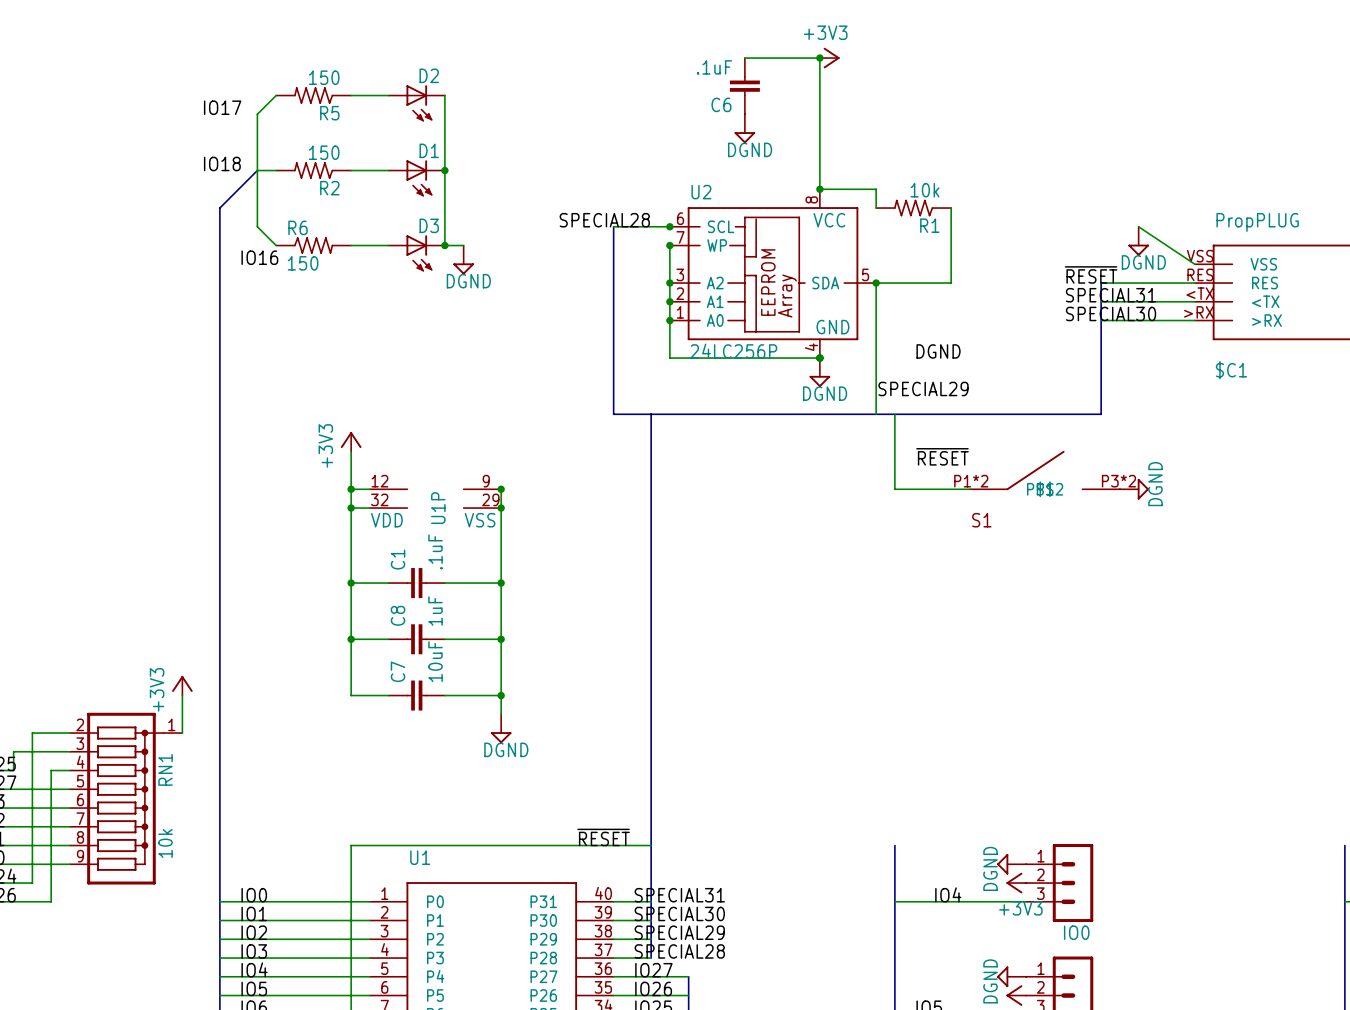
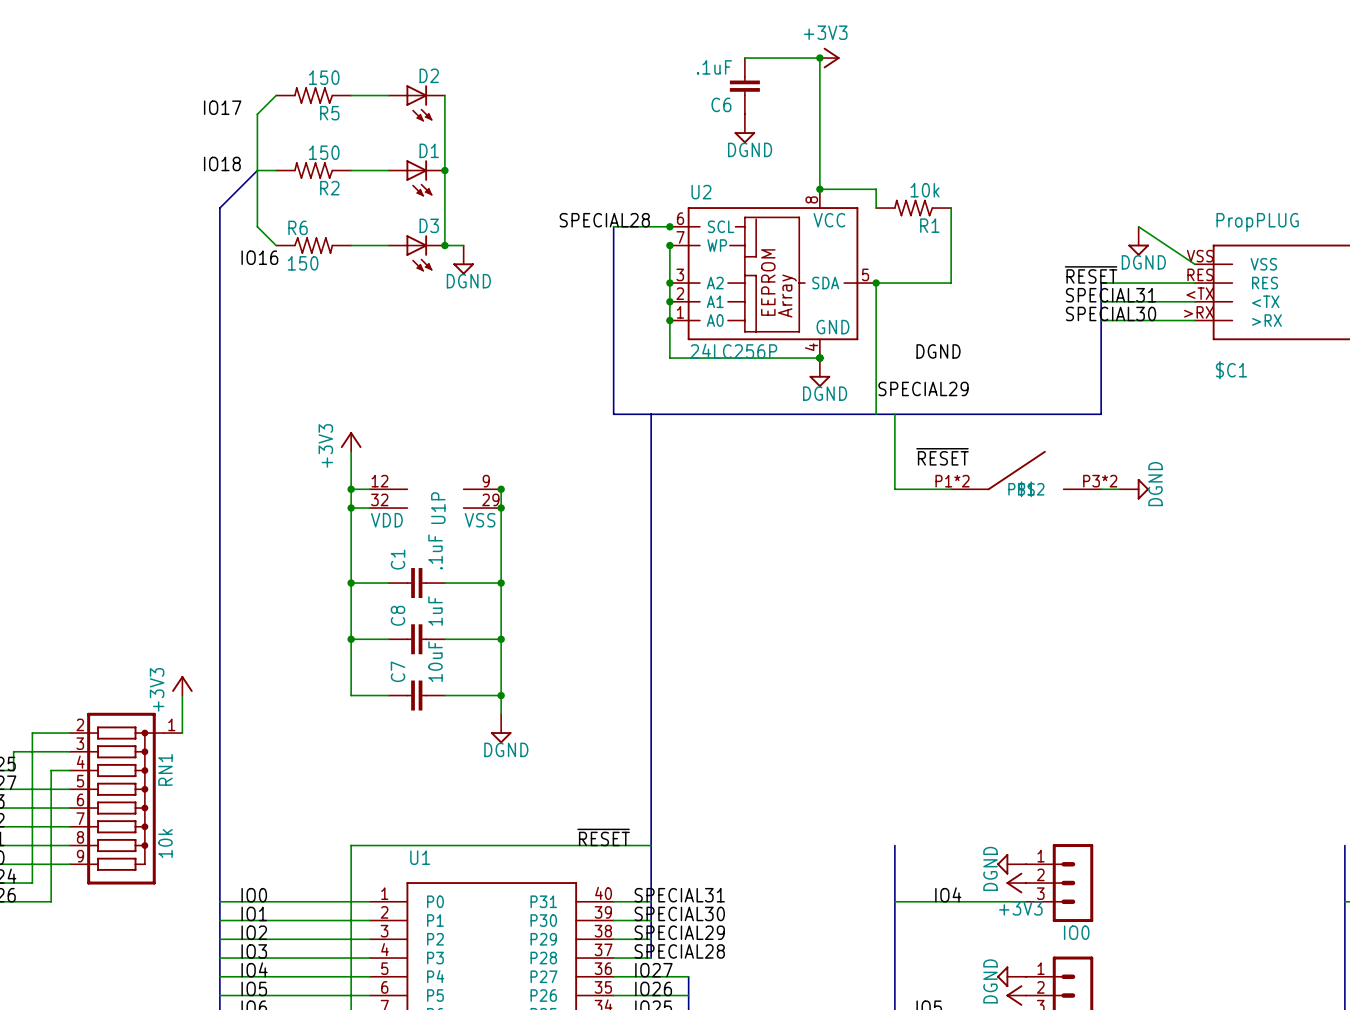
part: none -> (1026, 470)
S1: (1044, 470) -> none

